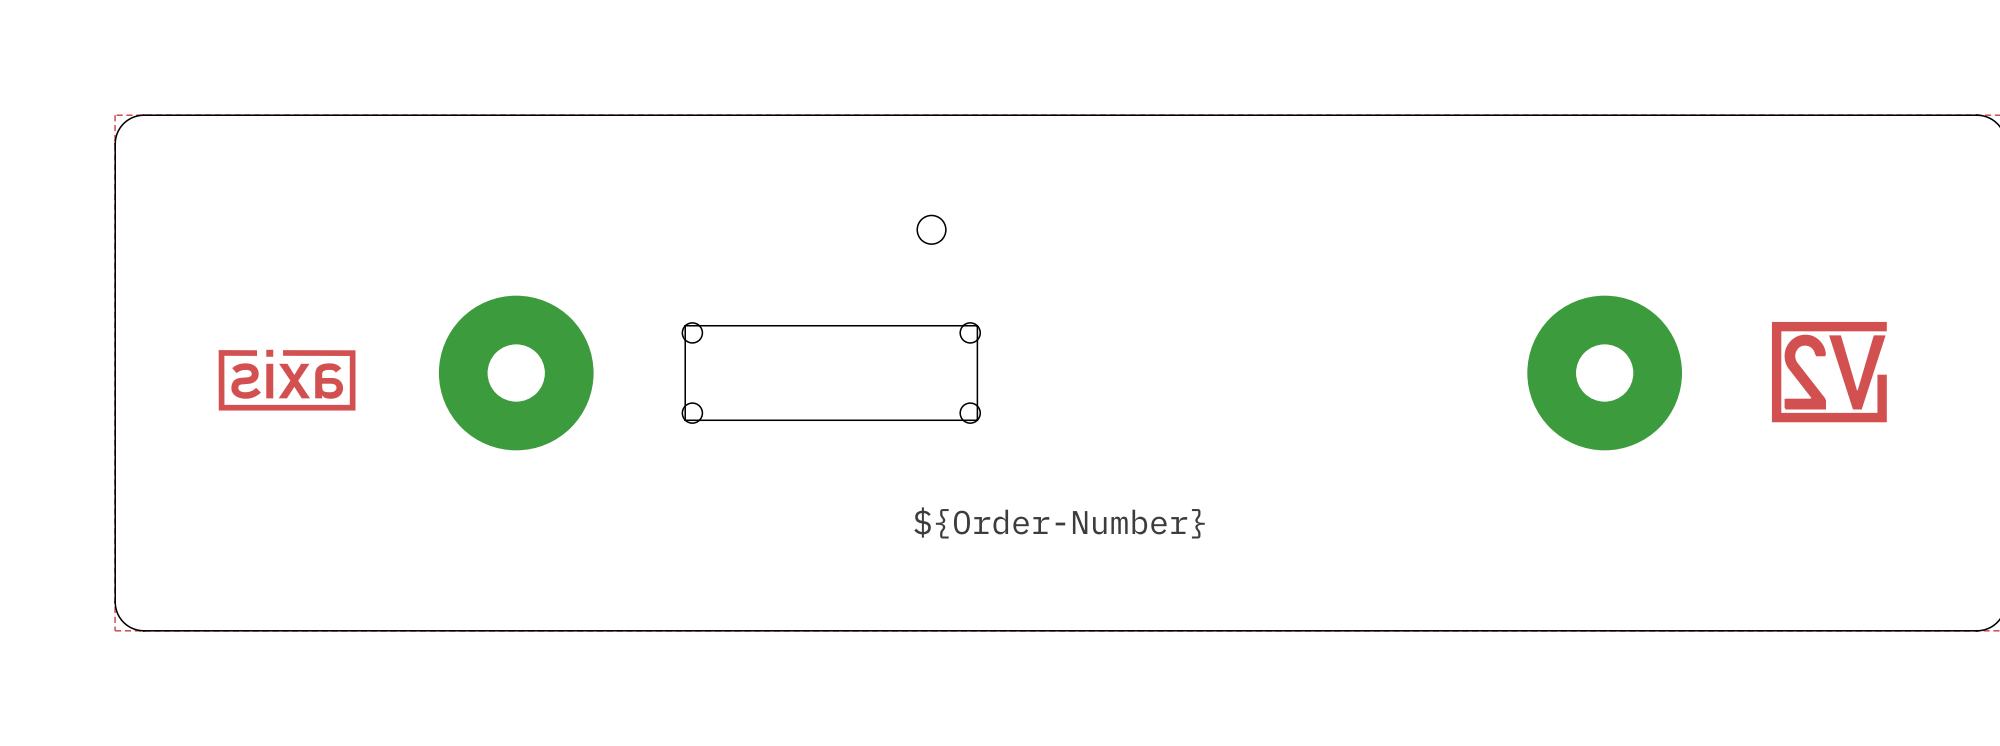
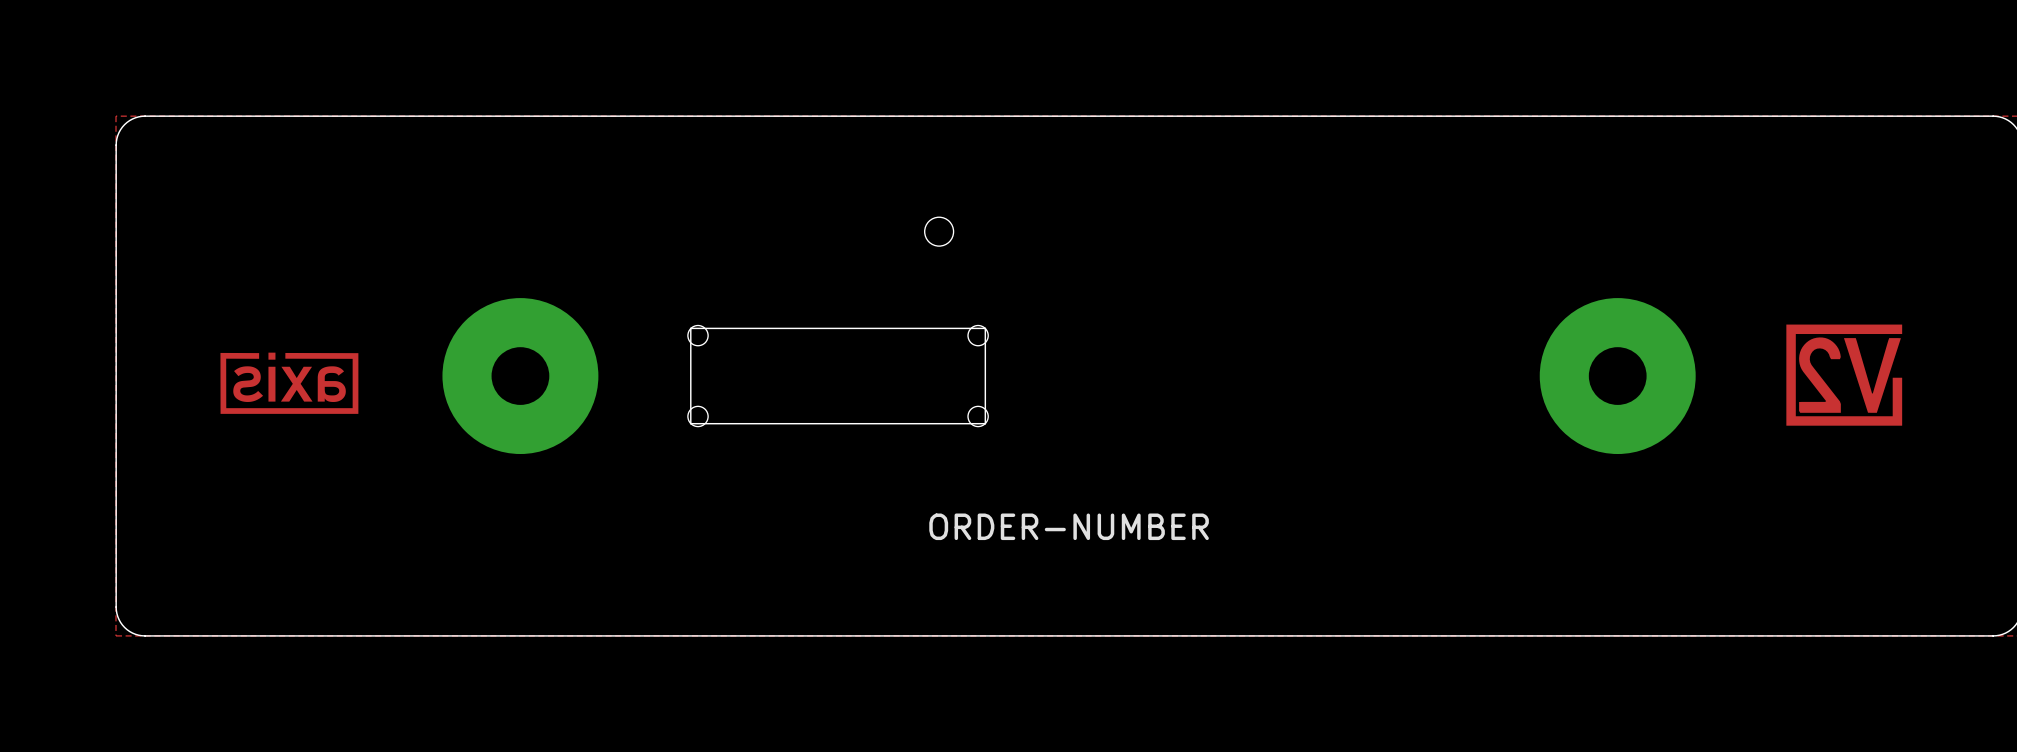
drawing shape: [914, 507, 1205, 539] -> [929, 513, 1209, 541]

